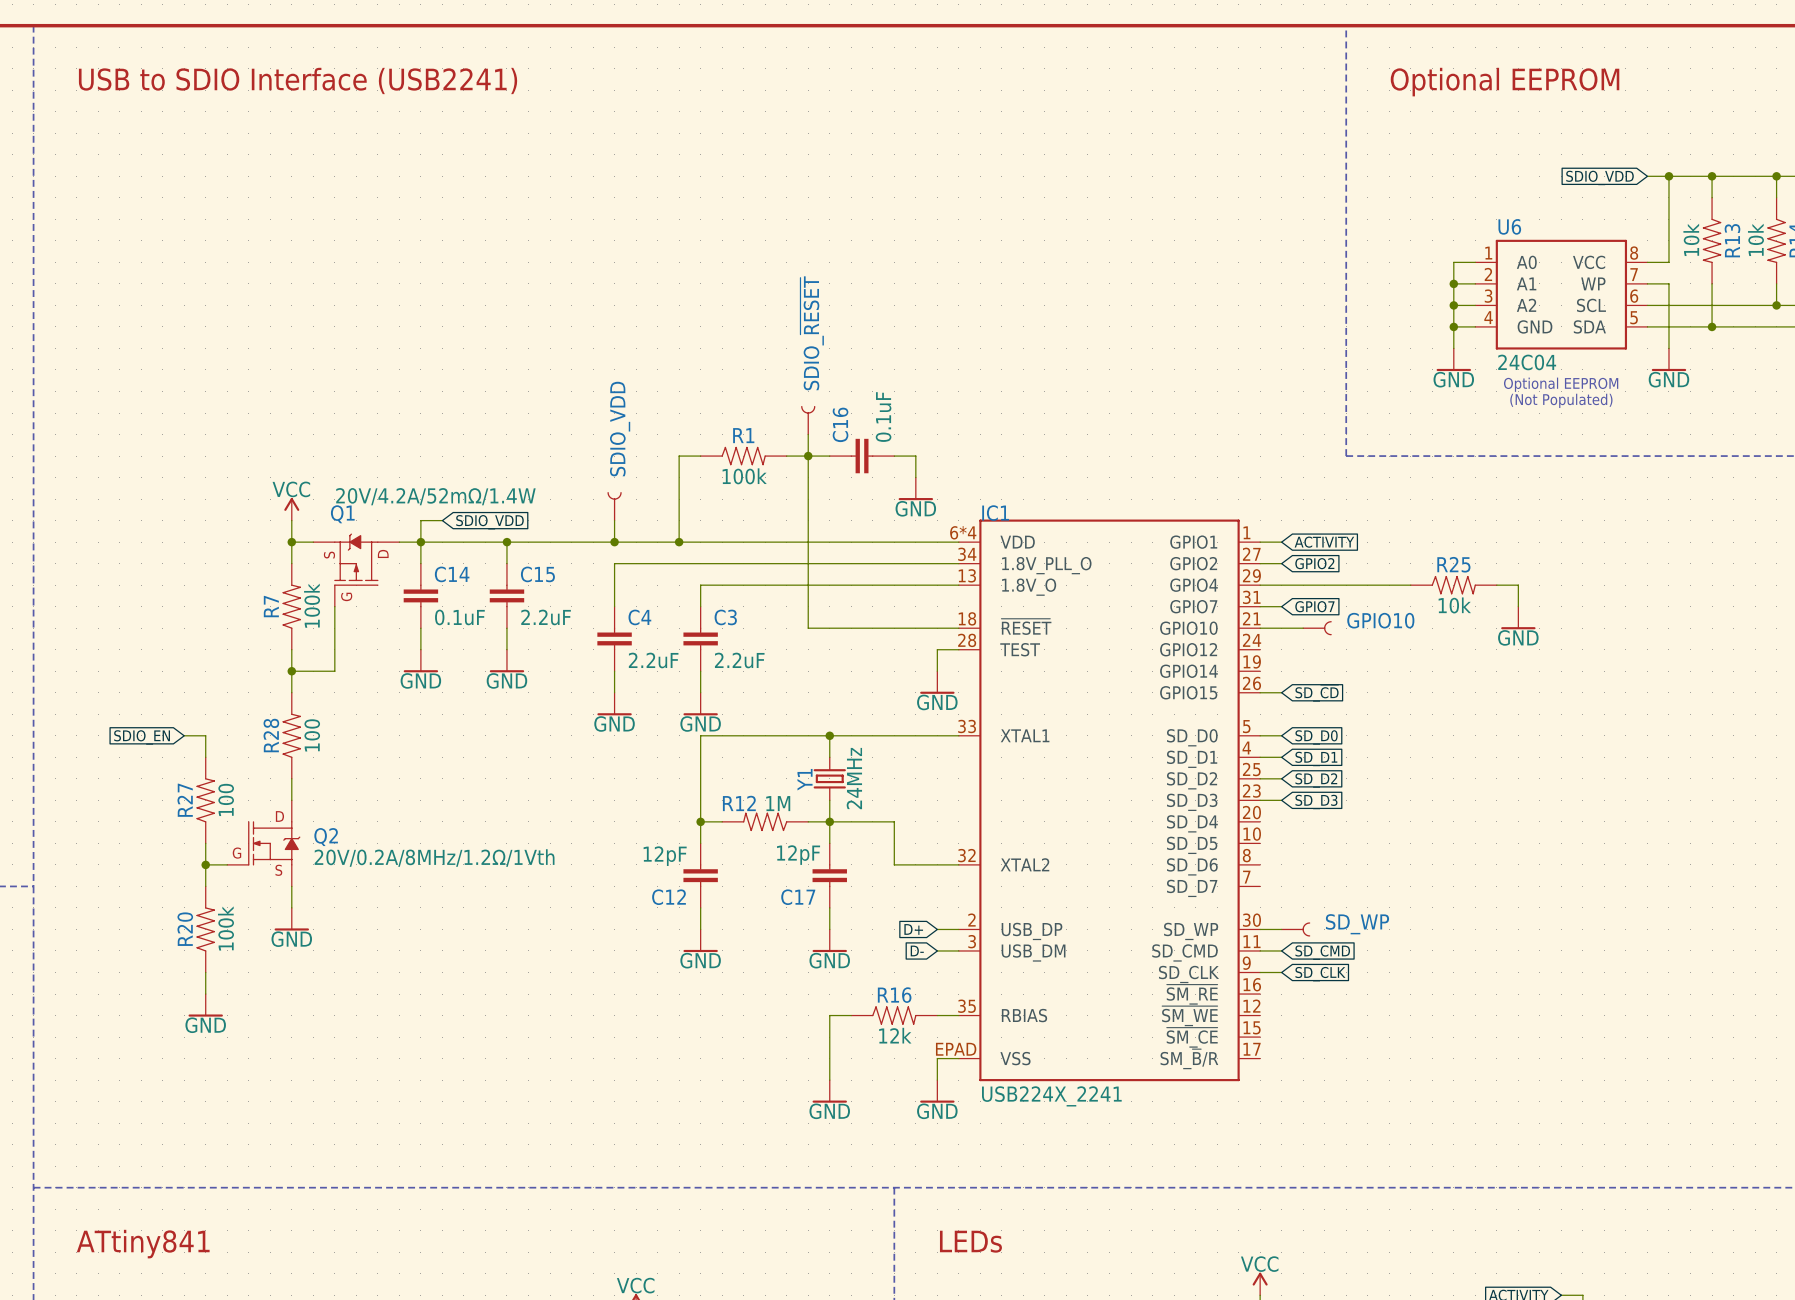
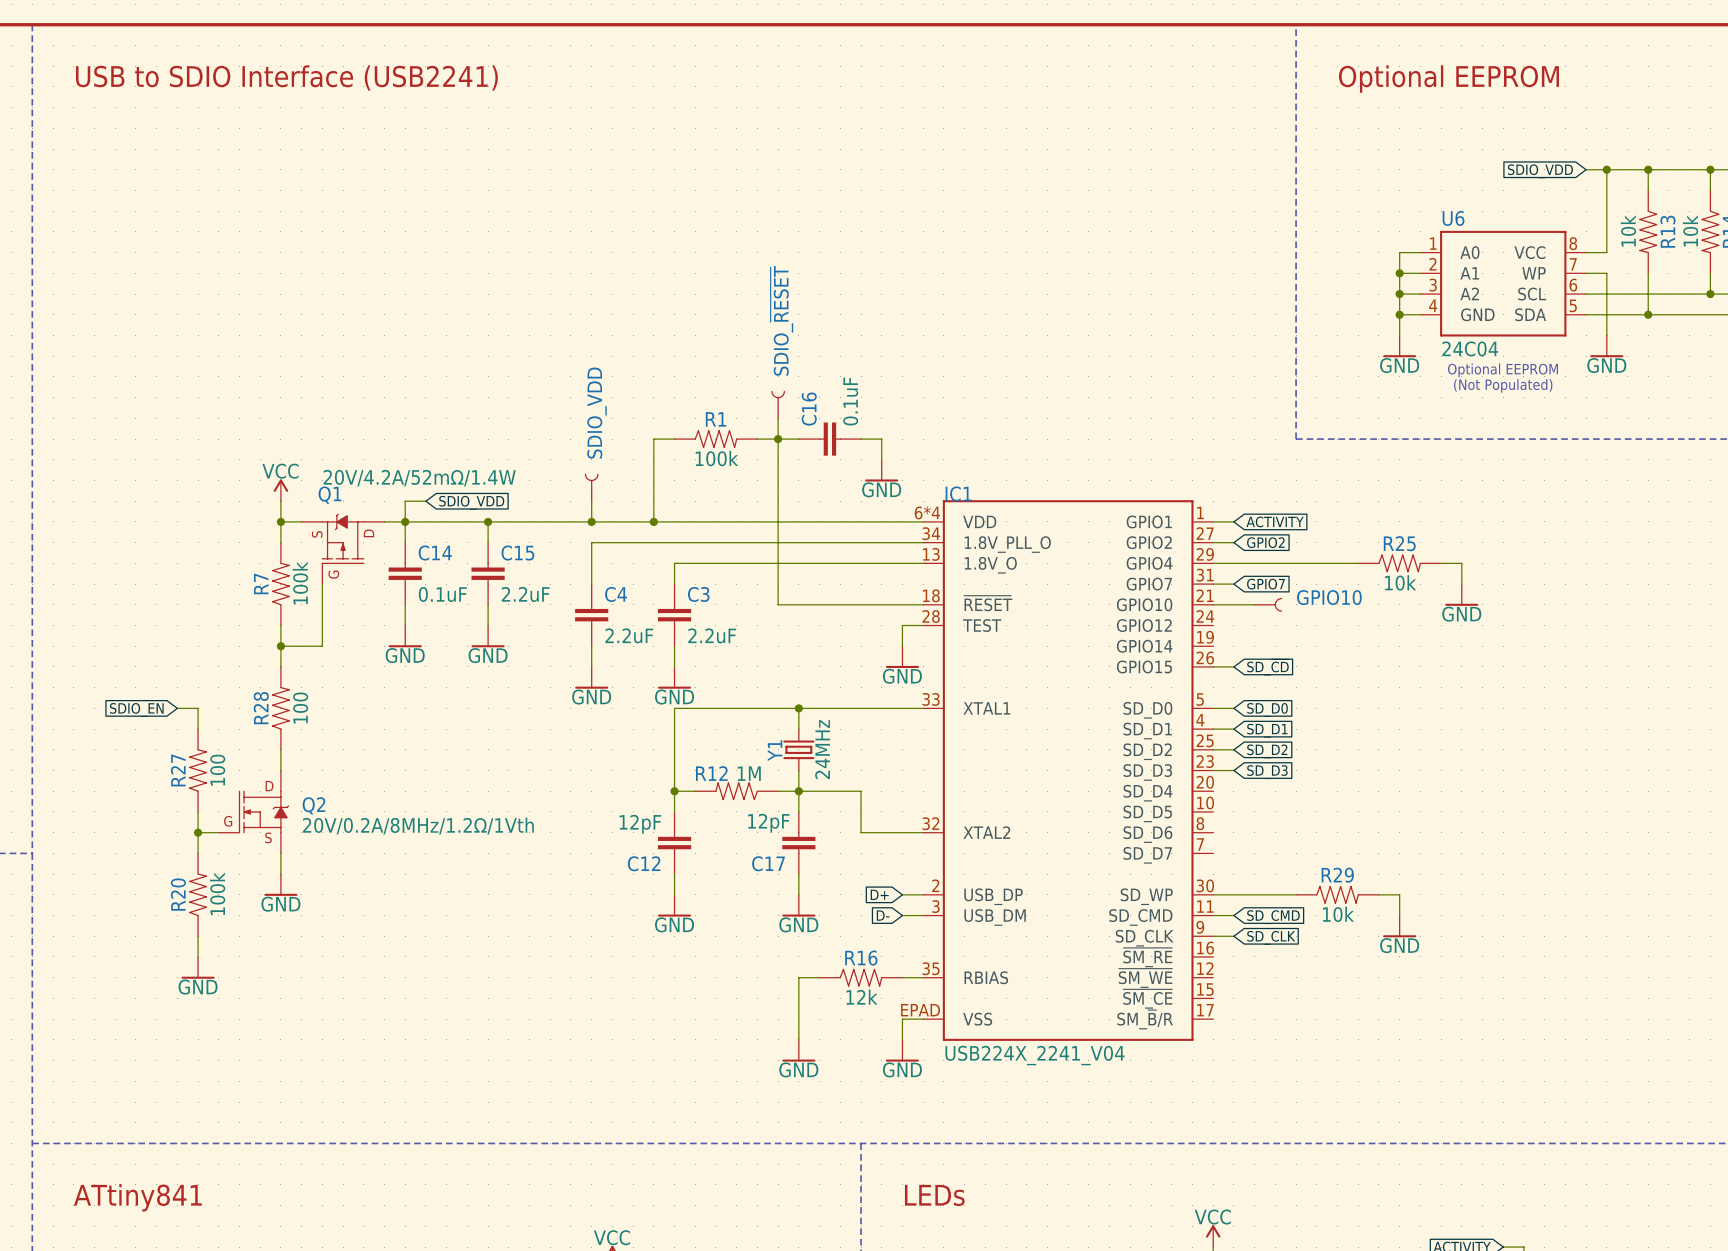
wire: none -> (1233, 894) (1296, 894)
SD_WP: (1295, 929) -> none
R29: none -> 10k (1337, 894)
wire: none -> (1378, 894) (1399, 894) (1399, 915)
power symbol: none -> GND (1399, 926)
IC1 value: USB224X_2241 (1051, 1096) -> USB224X_2241_V04 (1034, 1055)

